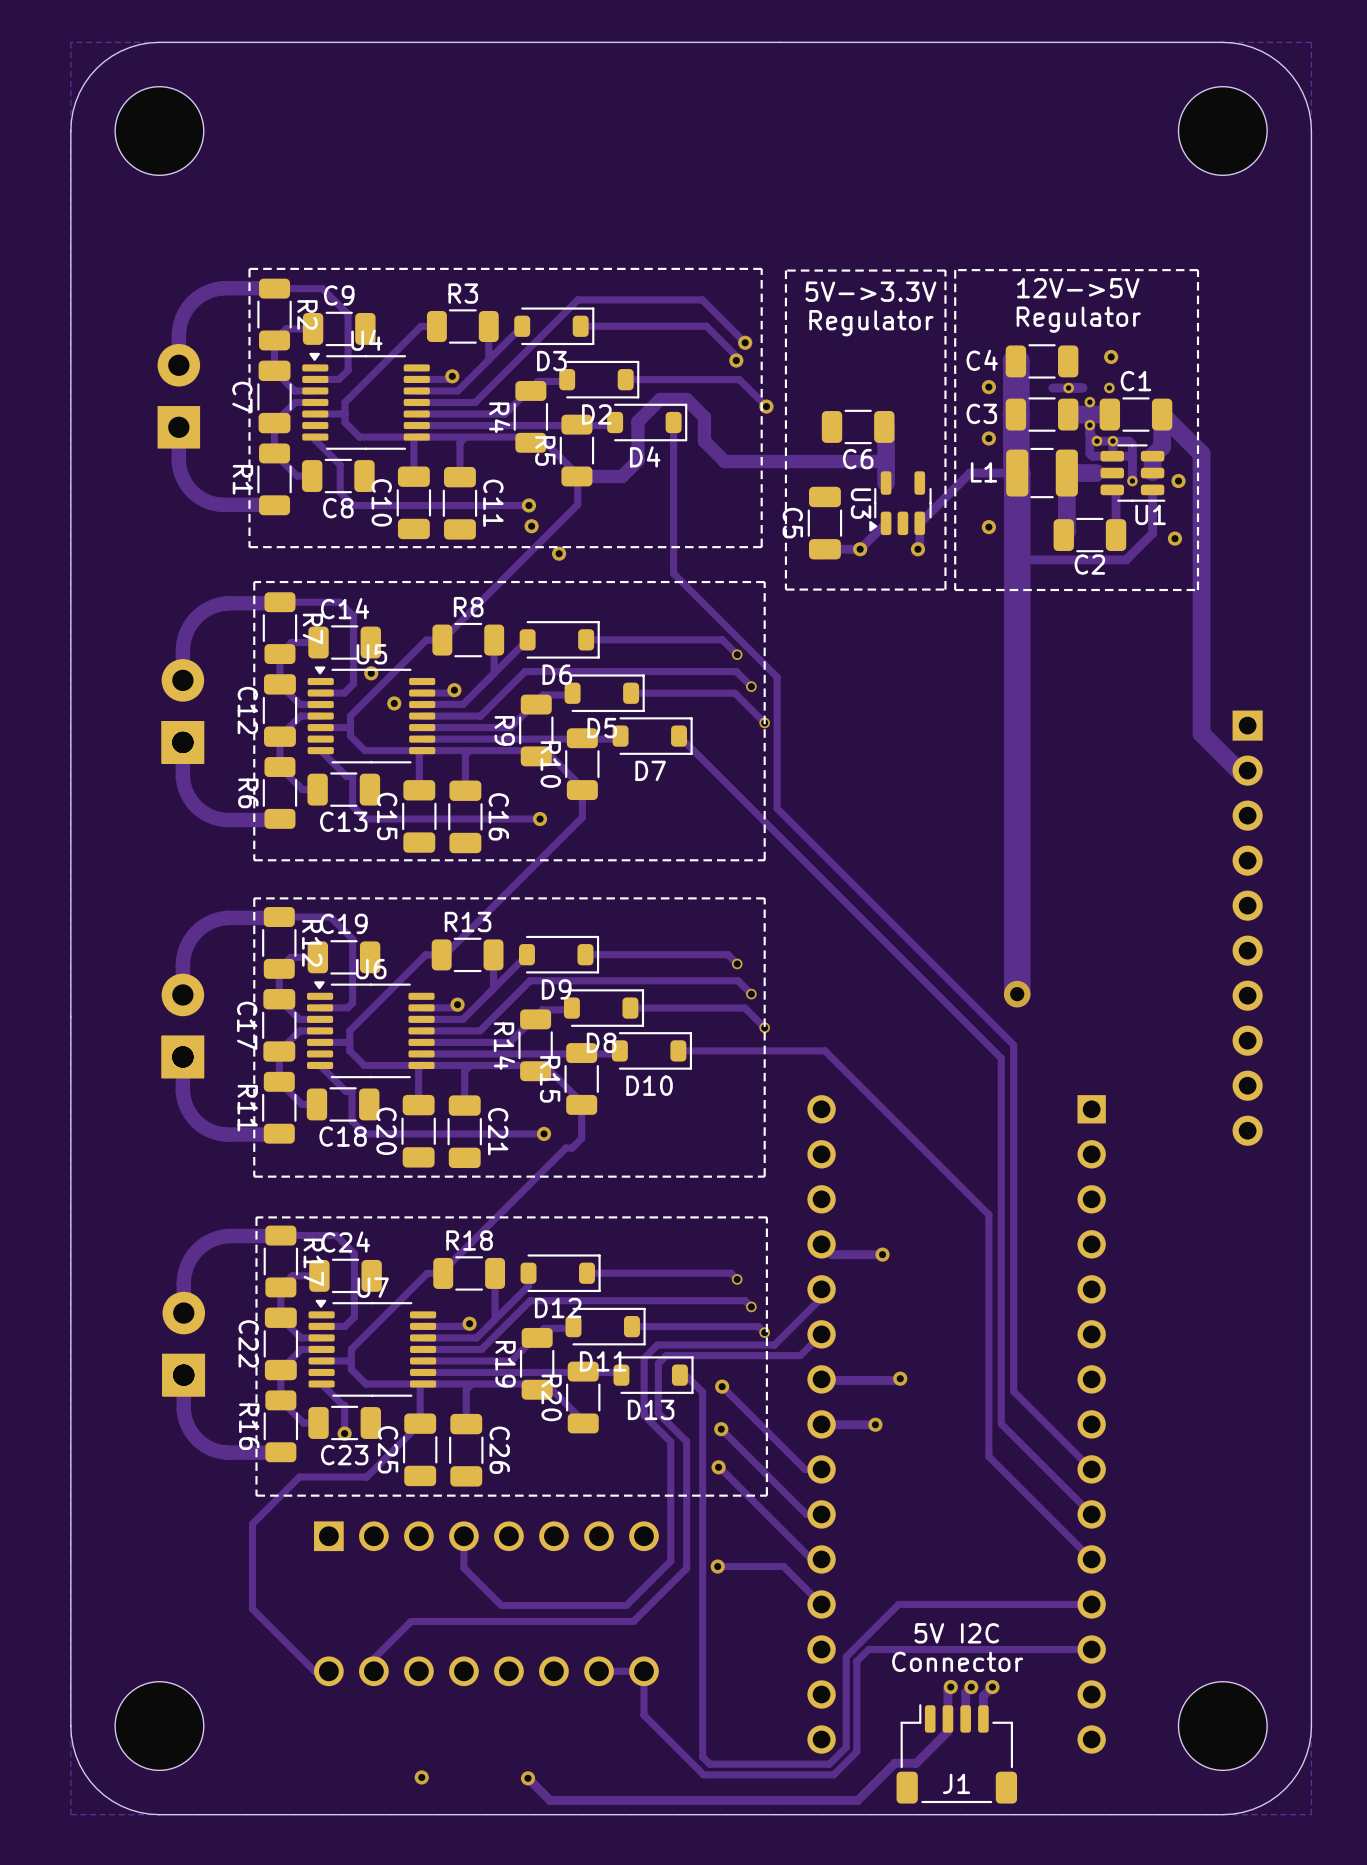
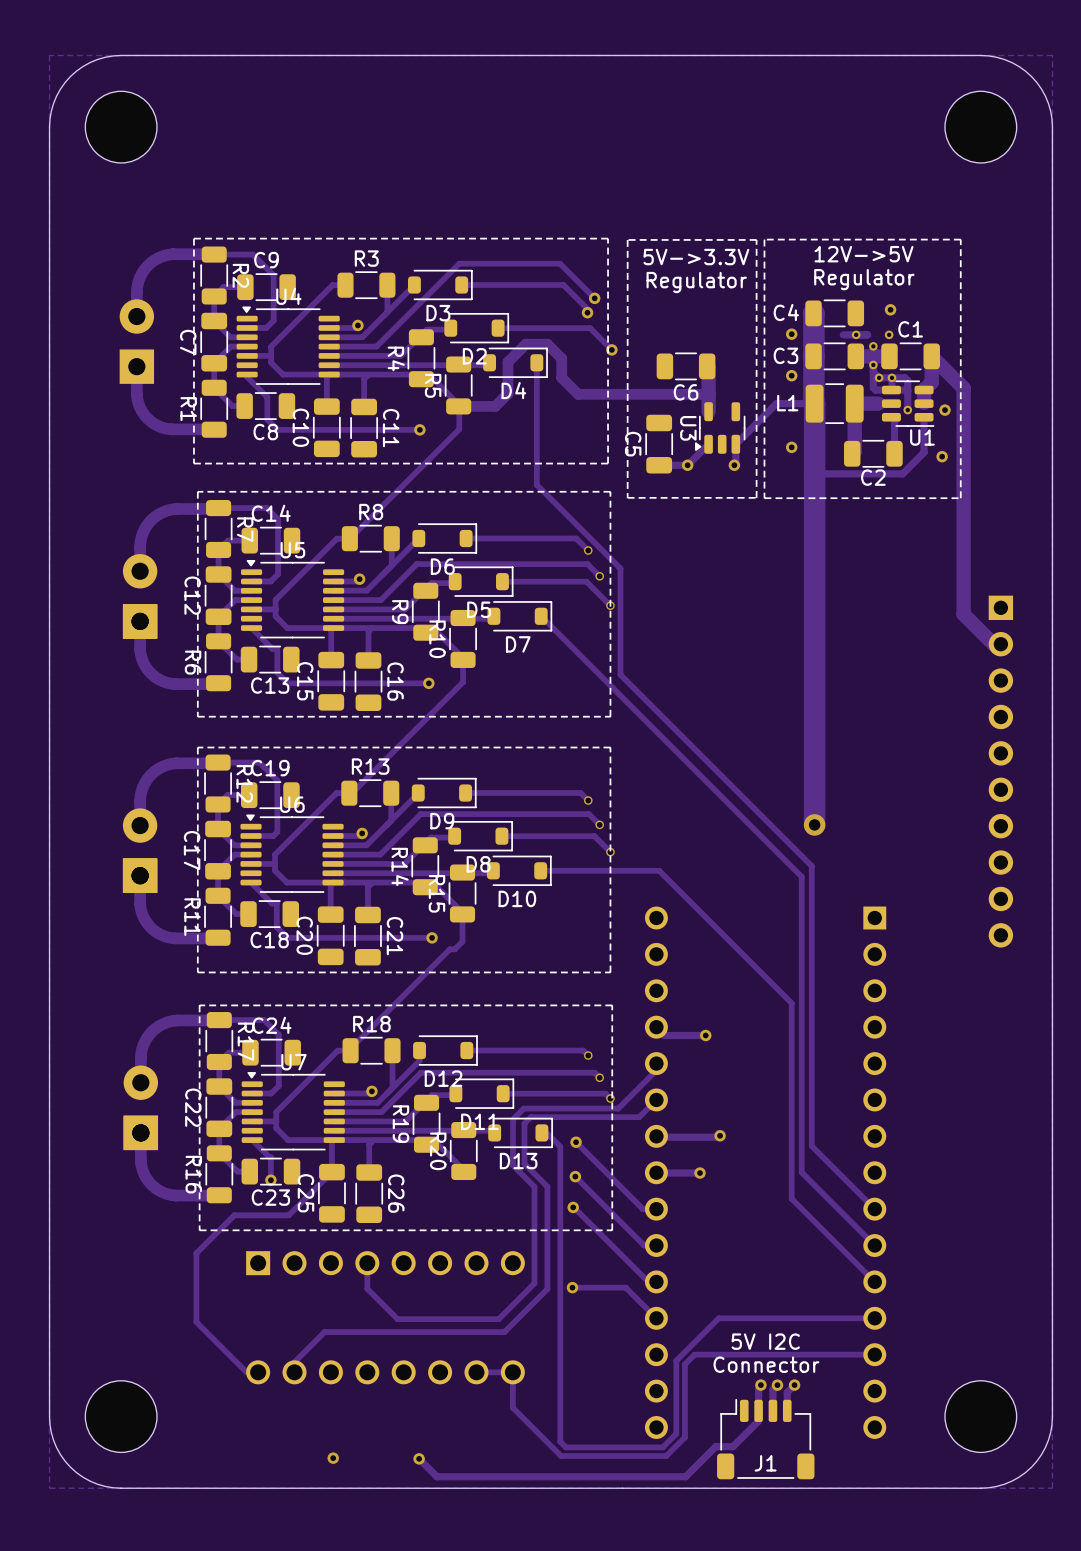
via: (531, 526) -> none
via: (559, 553) -> none
via: (371, 673) -> none
via: (394, 703) -> none

